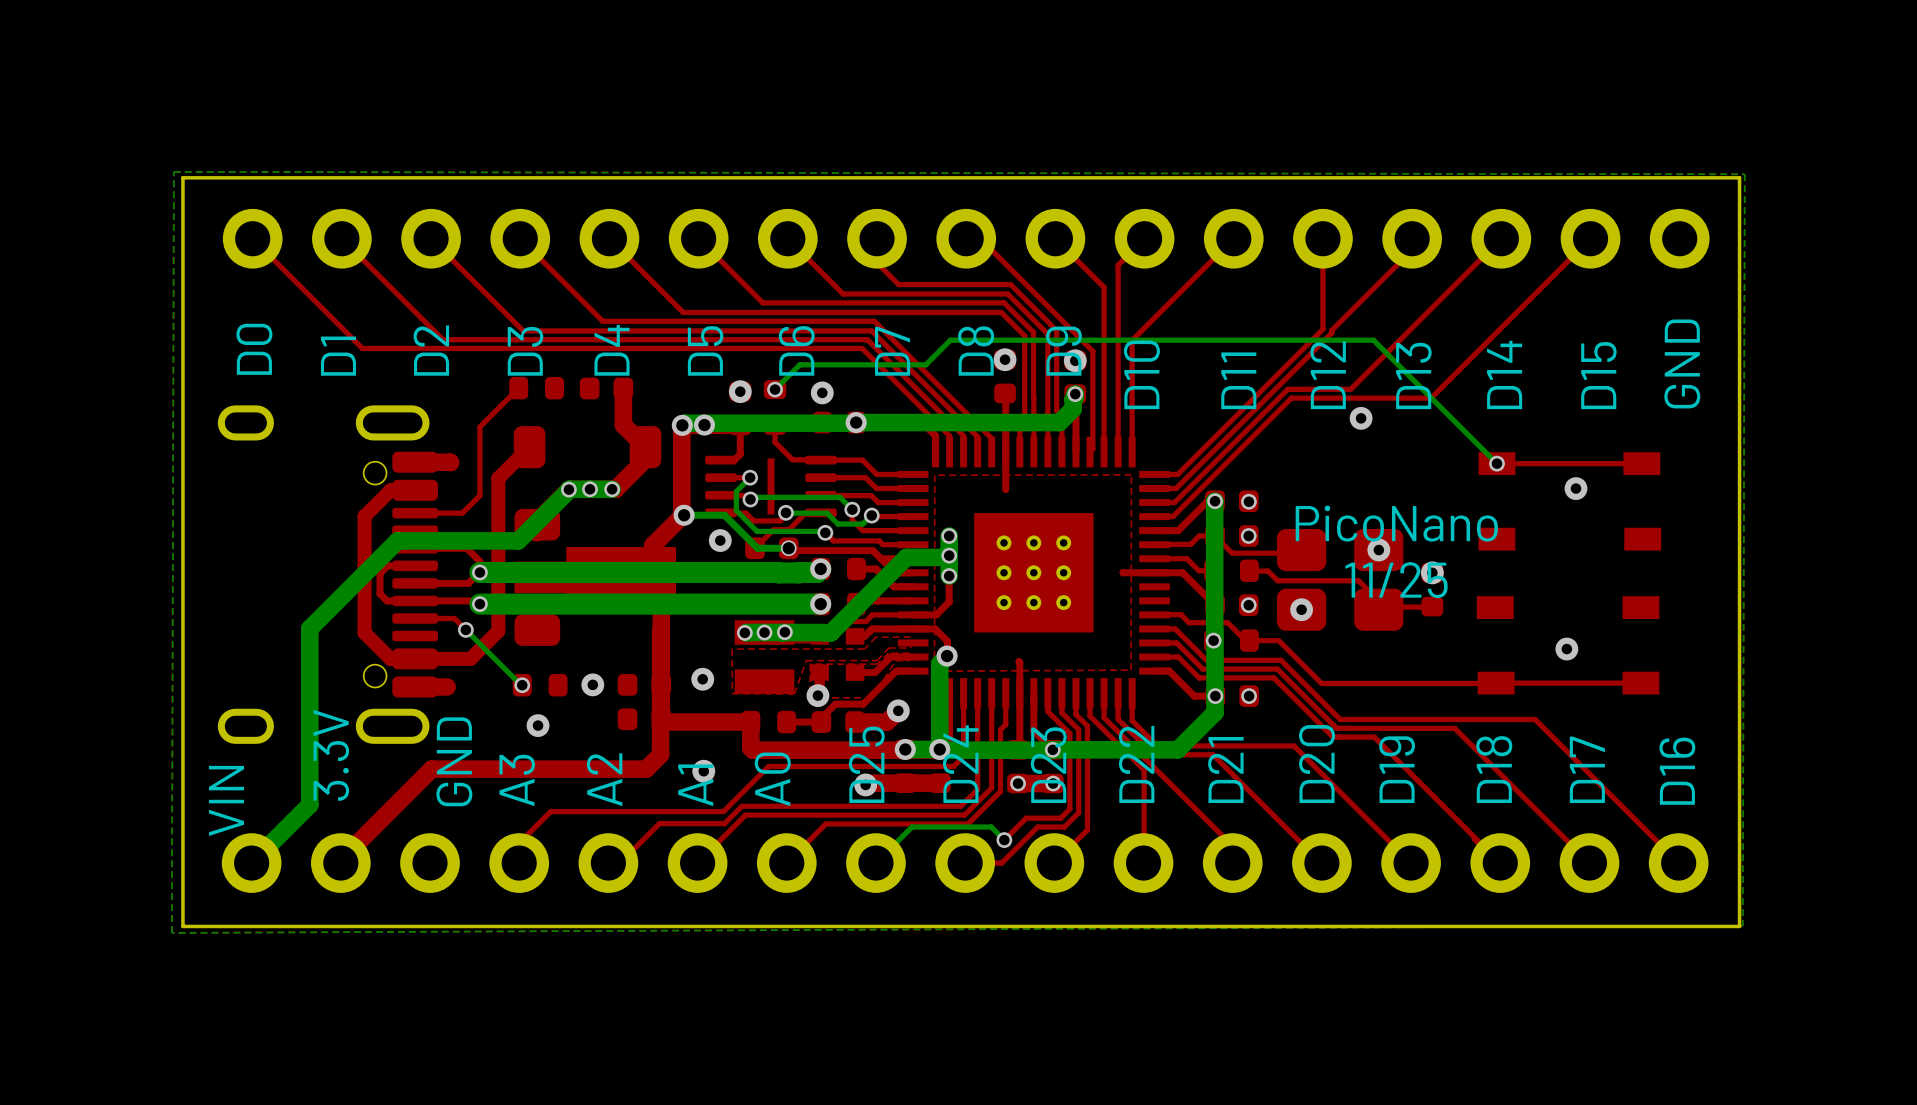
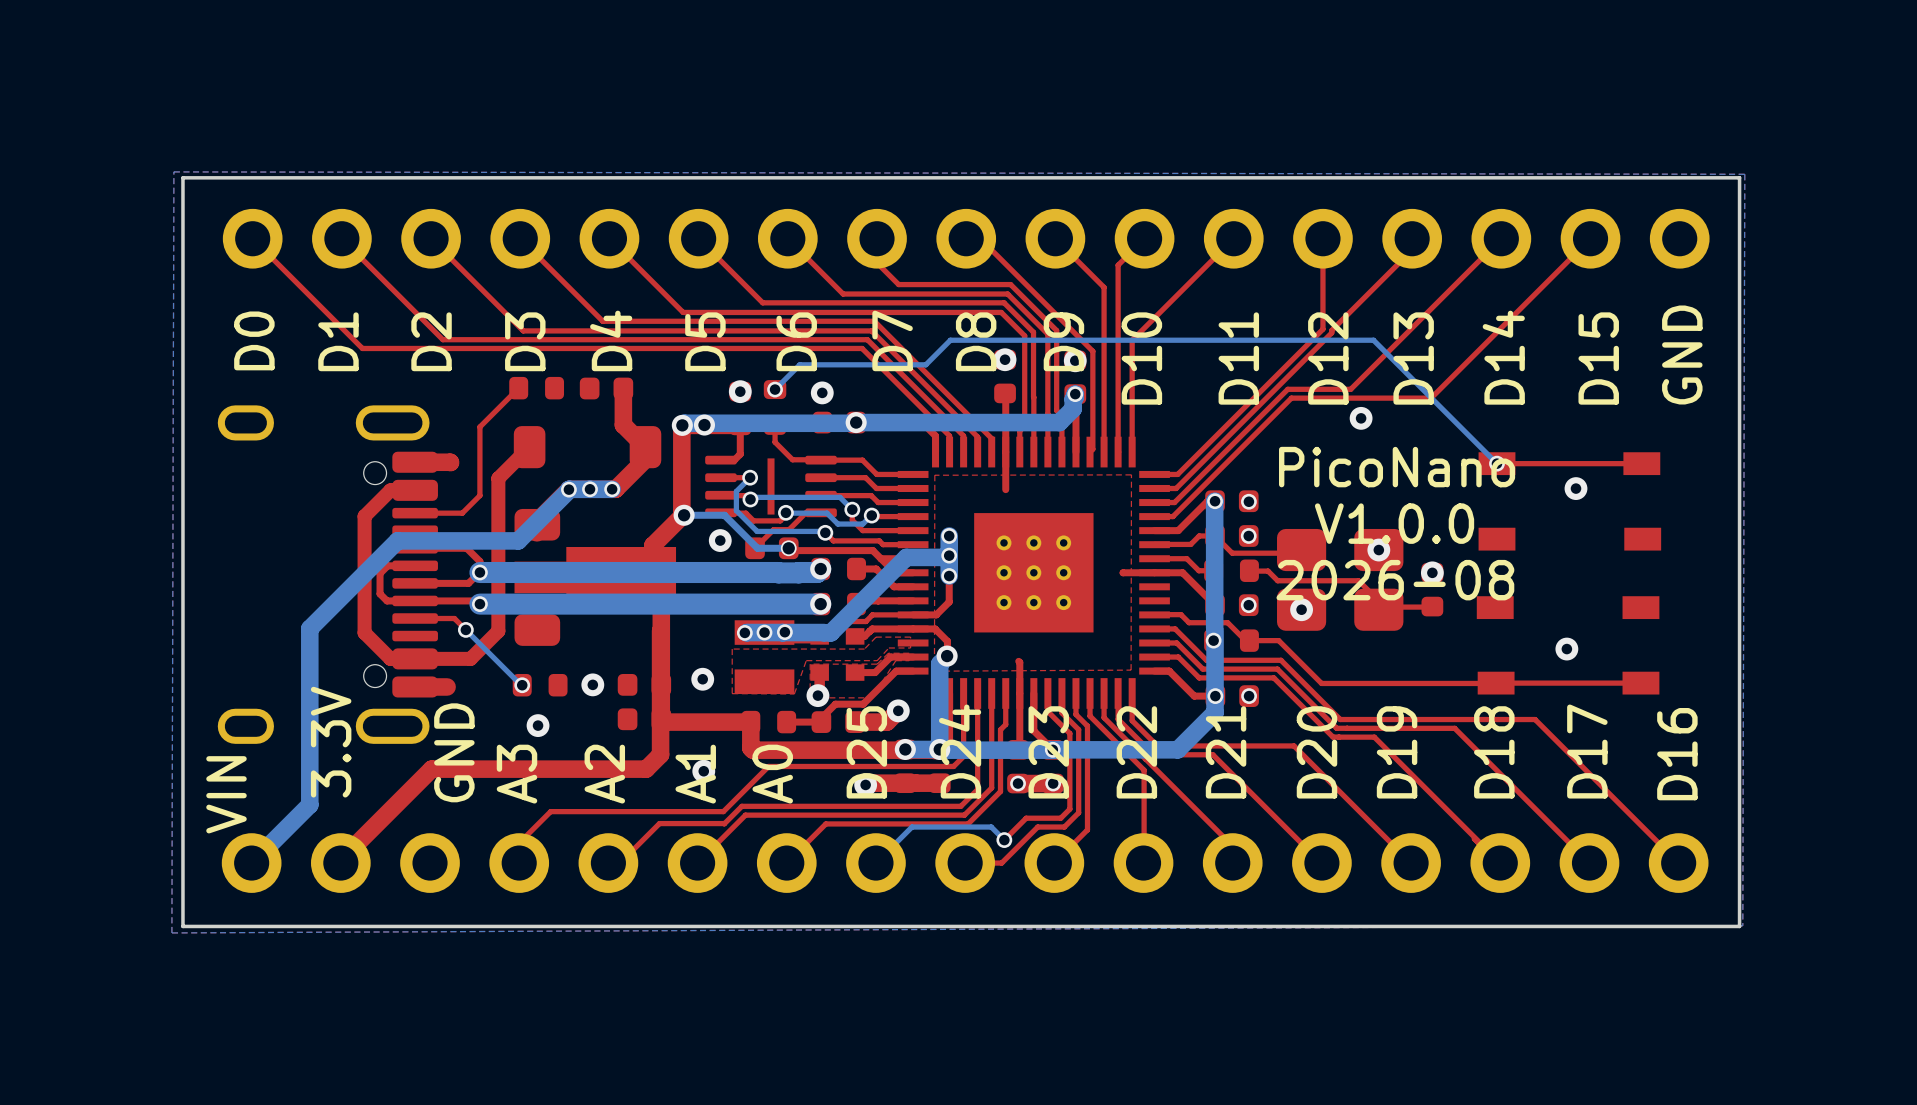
text: none -> PicoNano (1397, 467)
text: PicoNano (1396, 523) -> V1.0.0 (1394, 523)
text: 11/25 (1396, 580) -> 2026-08 (1395, 580)

